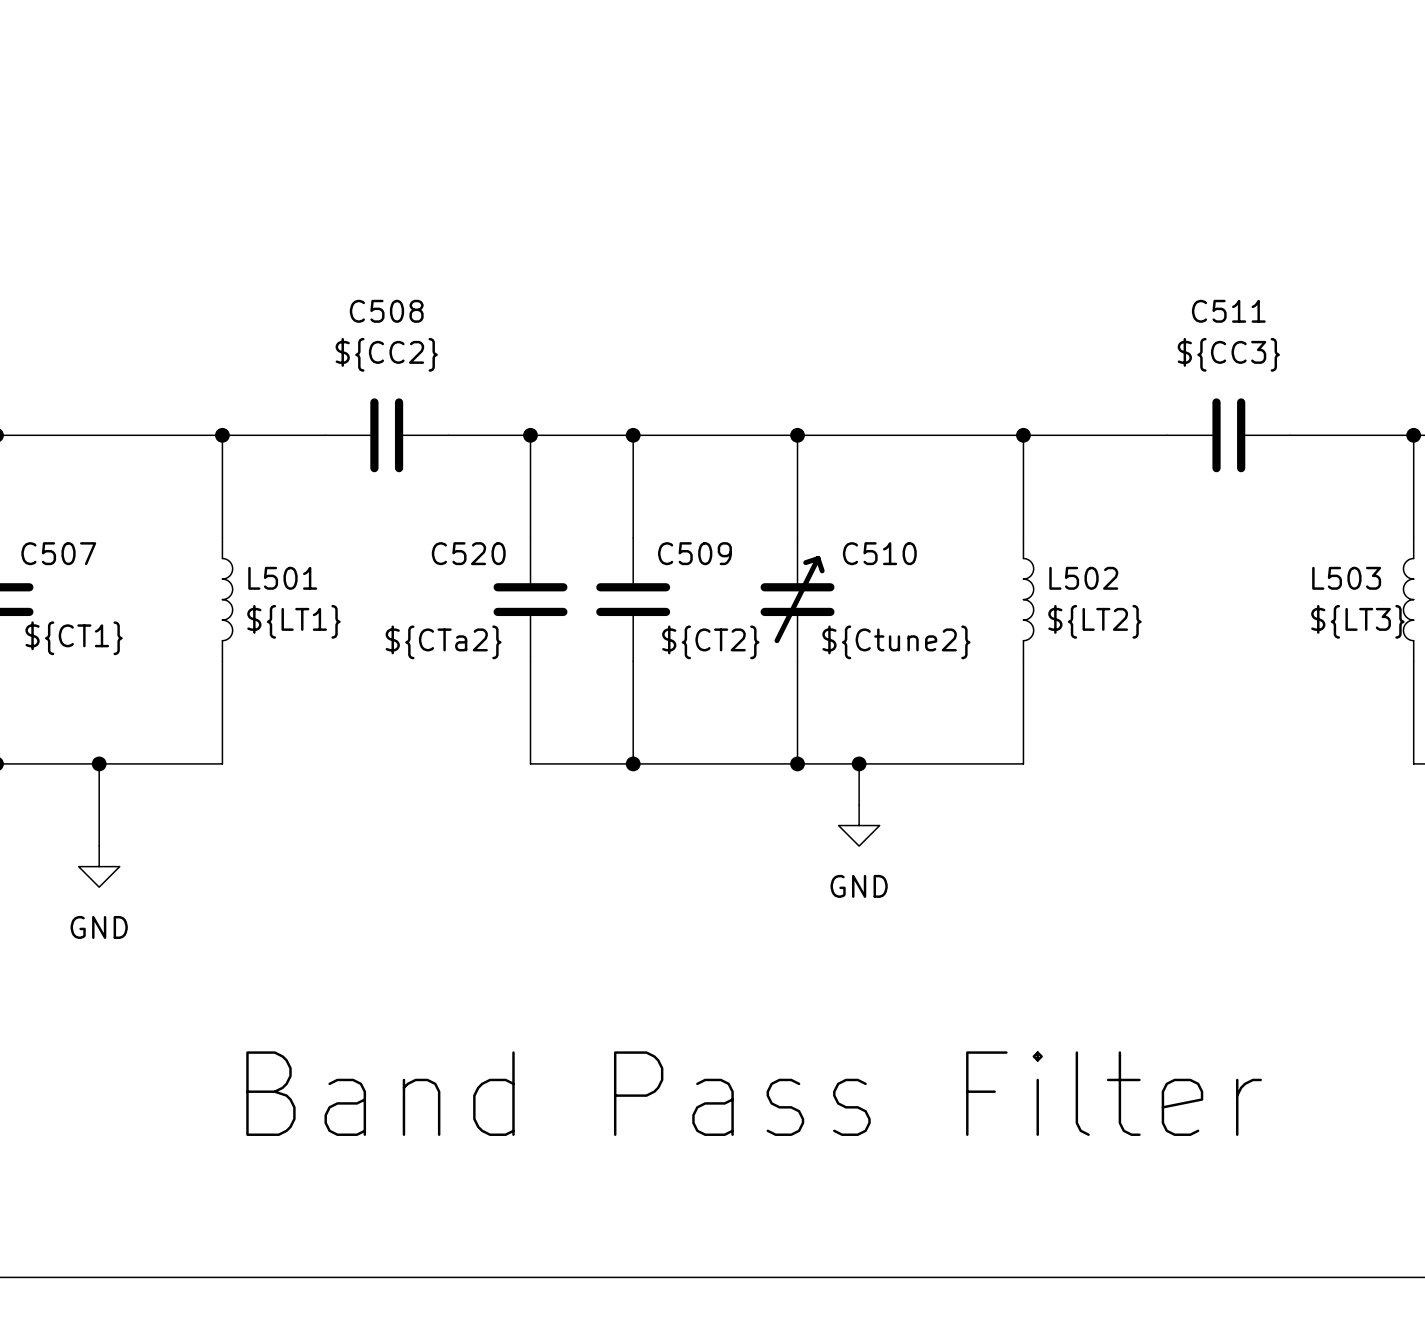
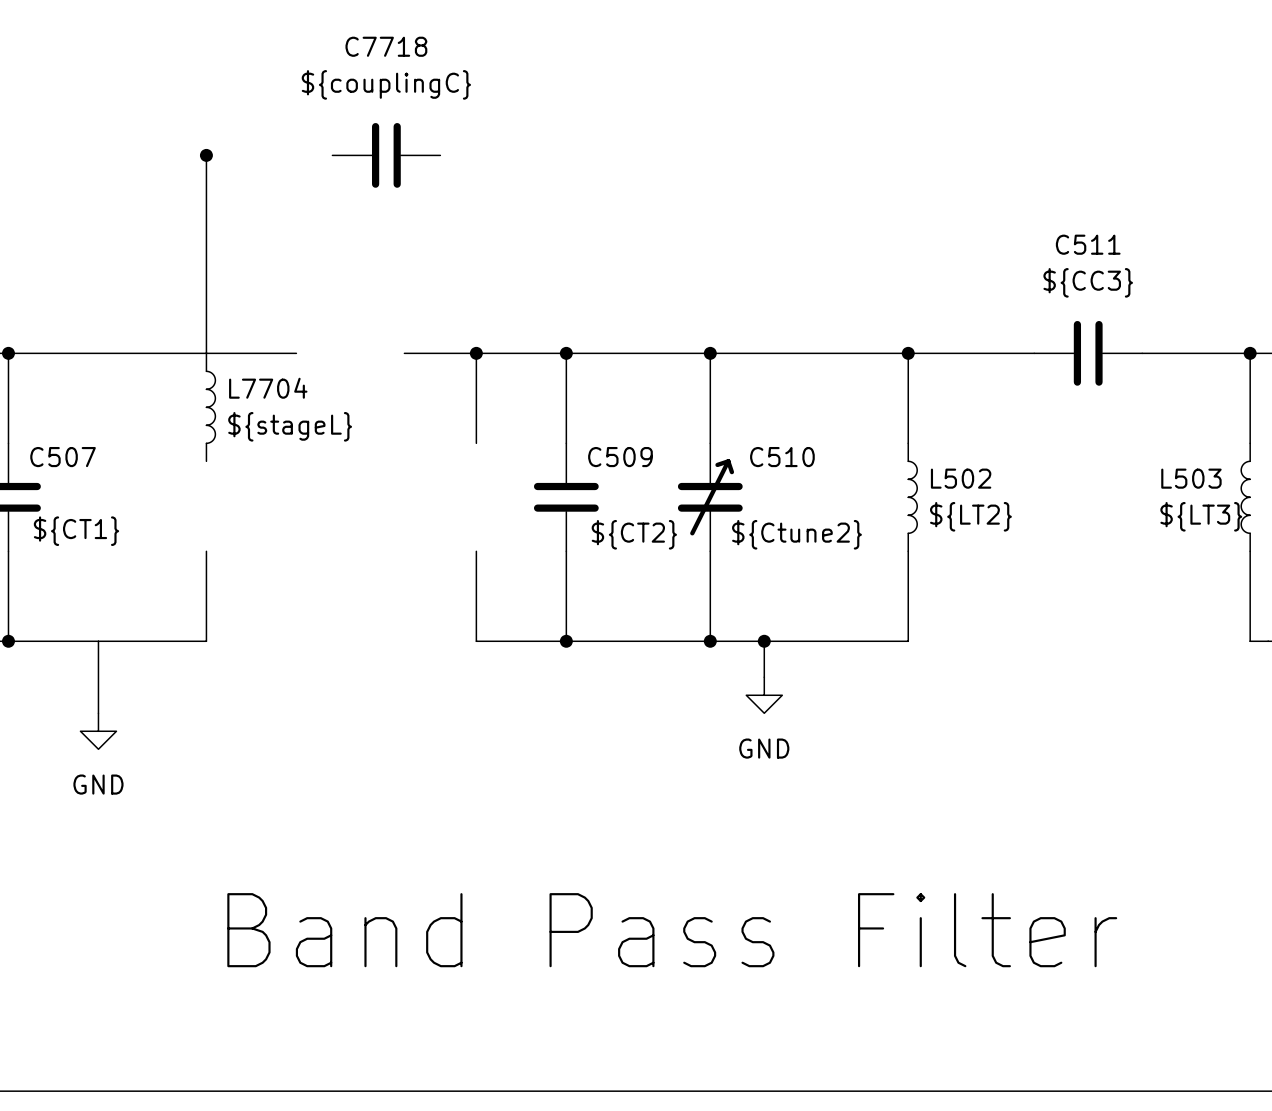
junction: none -> (206, 155)
C7718: none -> ${couplingC} (386, 155)
wire: (222, 435) (222, 537) -> (206, 353) (206, 155)
junction: (222, 435) -> none
C508: ${CC2} (386, 435) -> none
L7704: none -> ${stageL} (210, 407)
L501: ${LT1} (227, 599) -> none
C520: ${CTa2} (530, 599) -> none
junction: (99, 763) -> none

